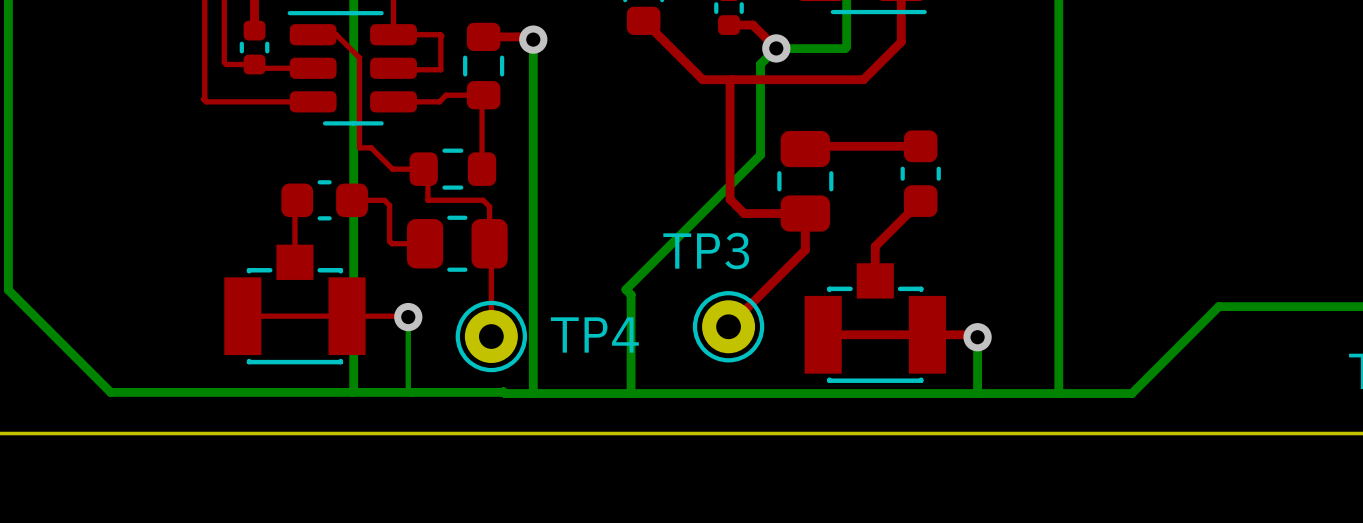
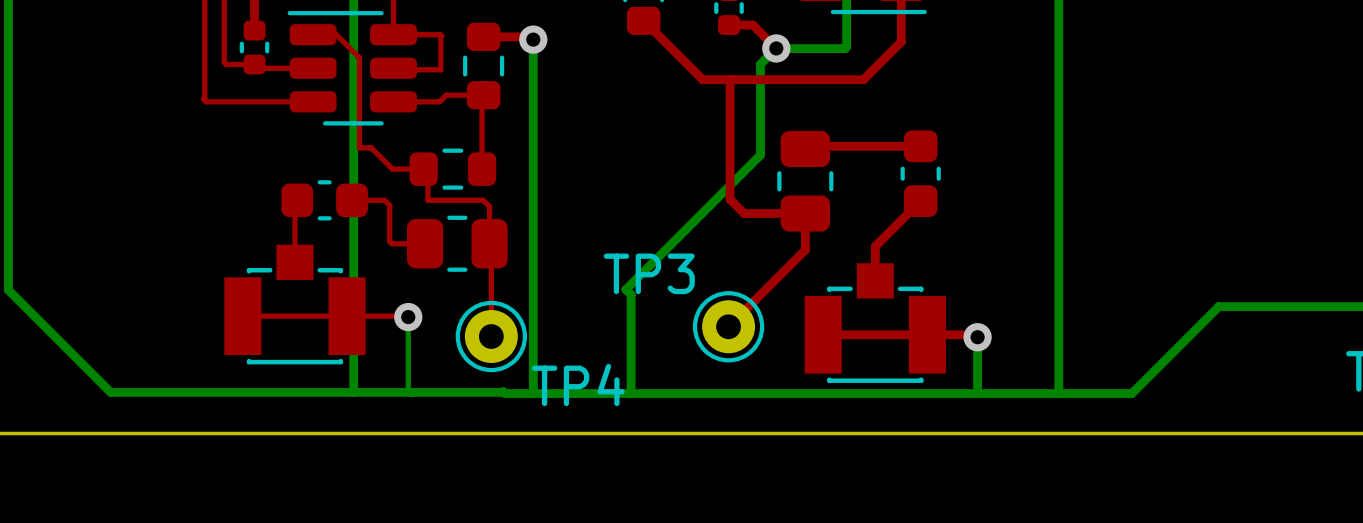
TP3 name position: TP3 (706, 250) -> TP3 (649, 273)
TP4 name position: TP4 (594, 334) -> TP4 (578, 385)

